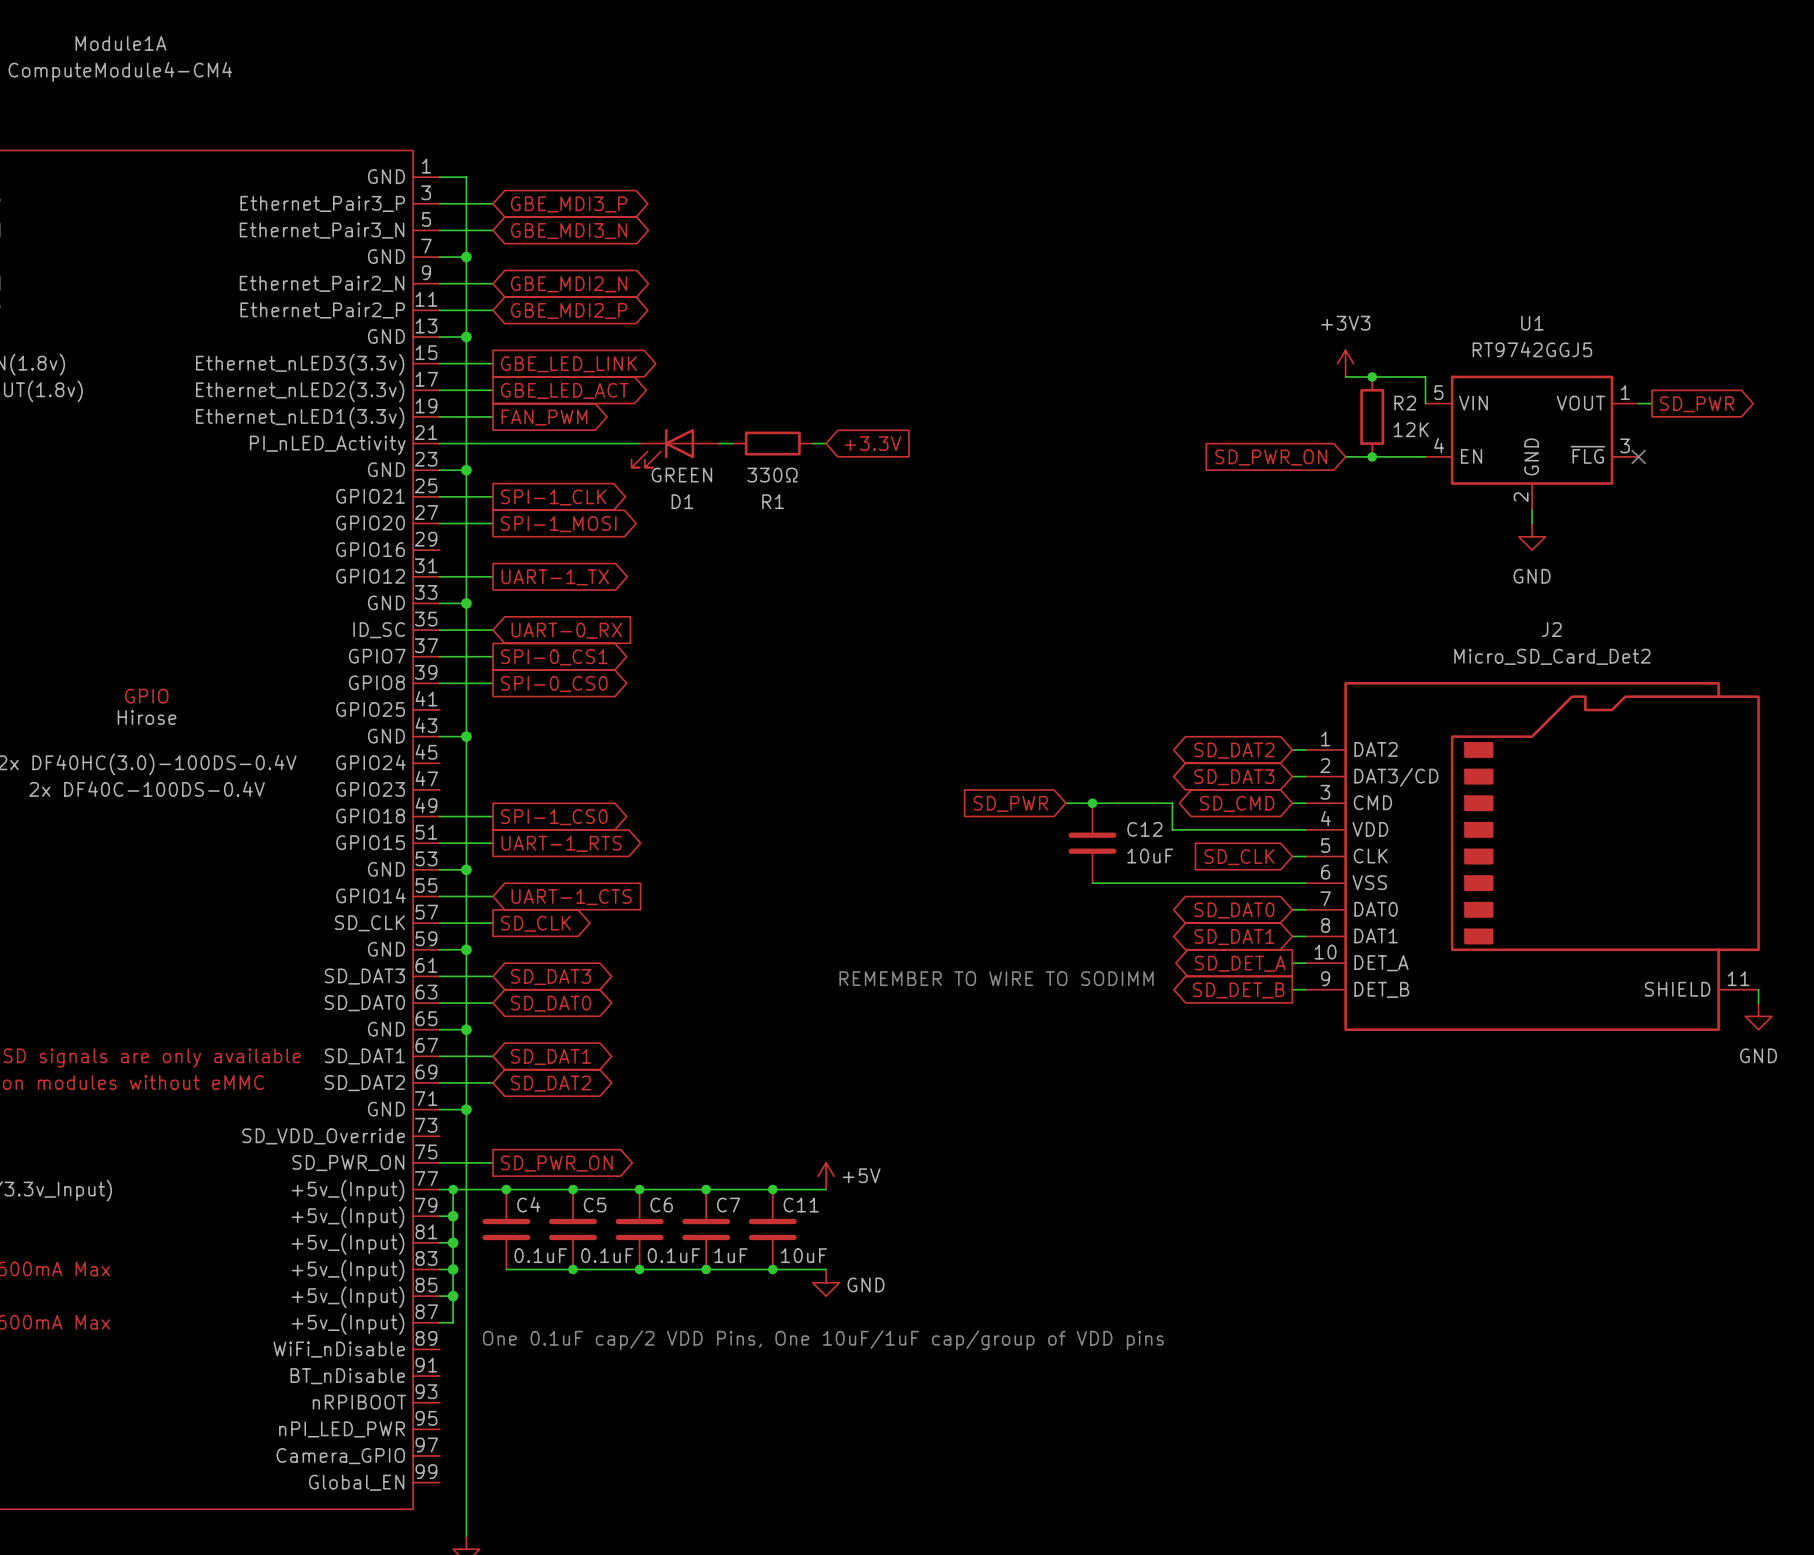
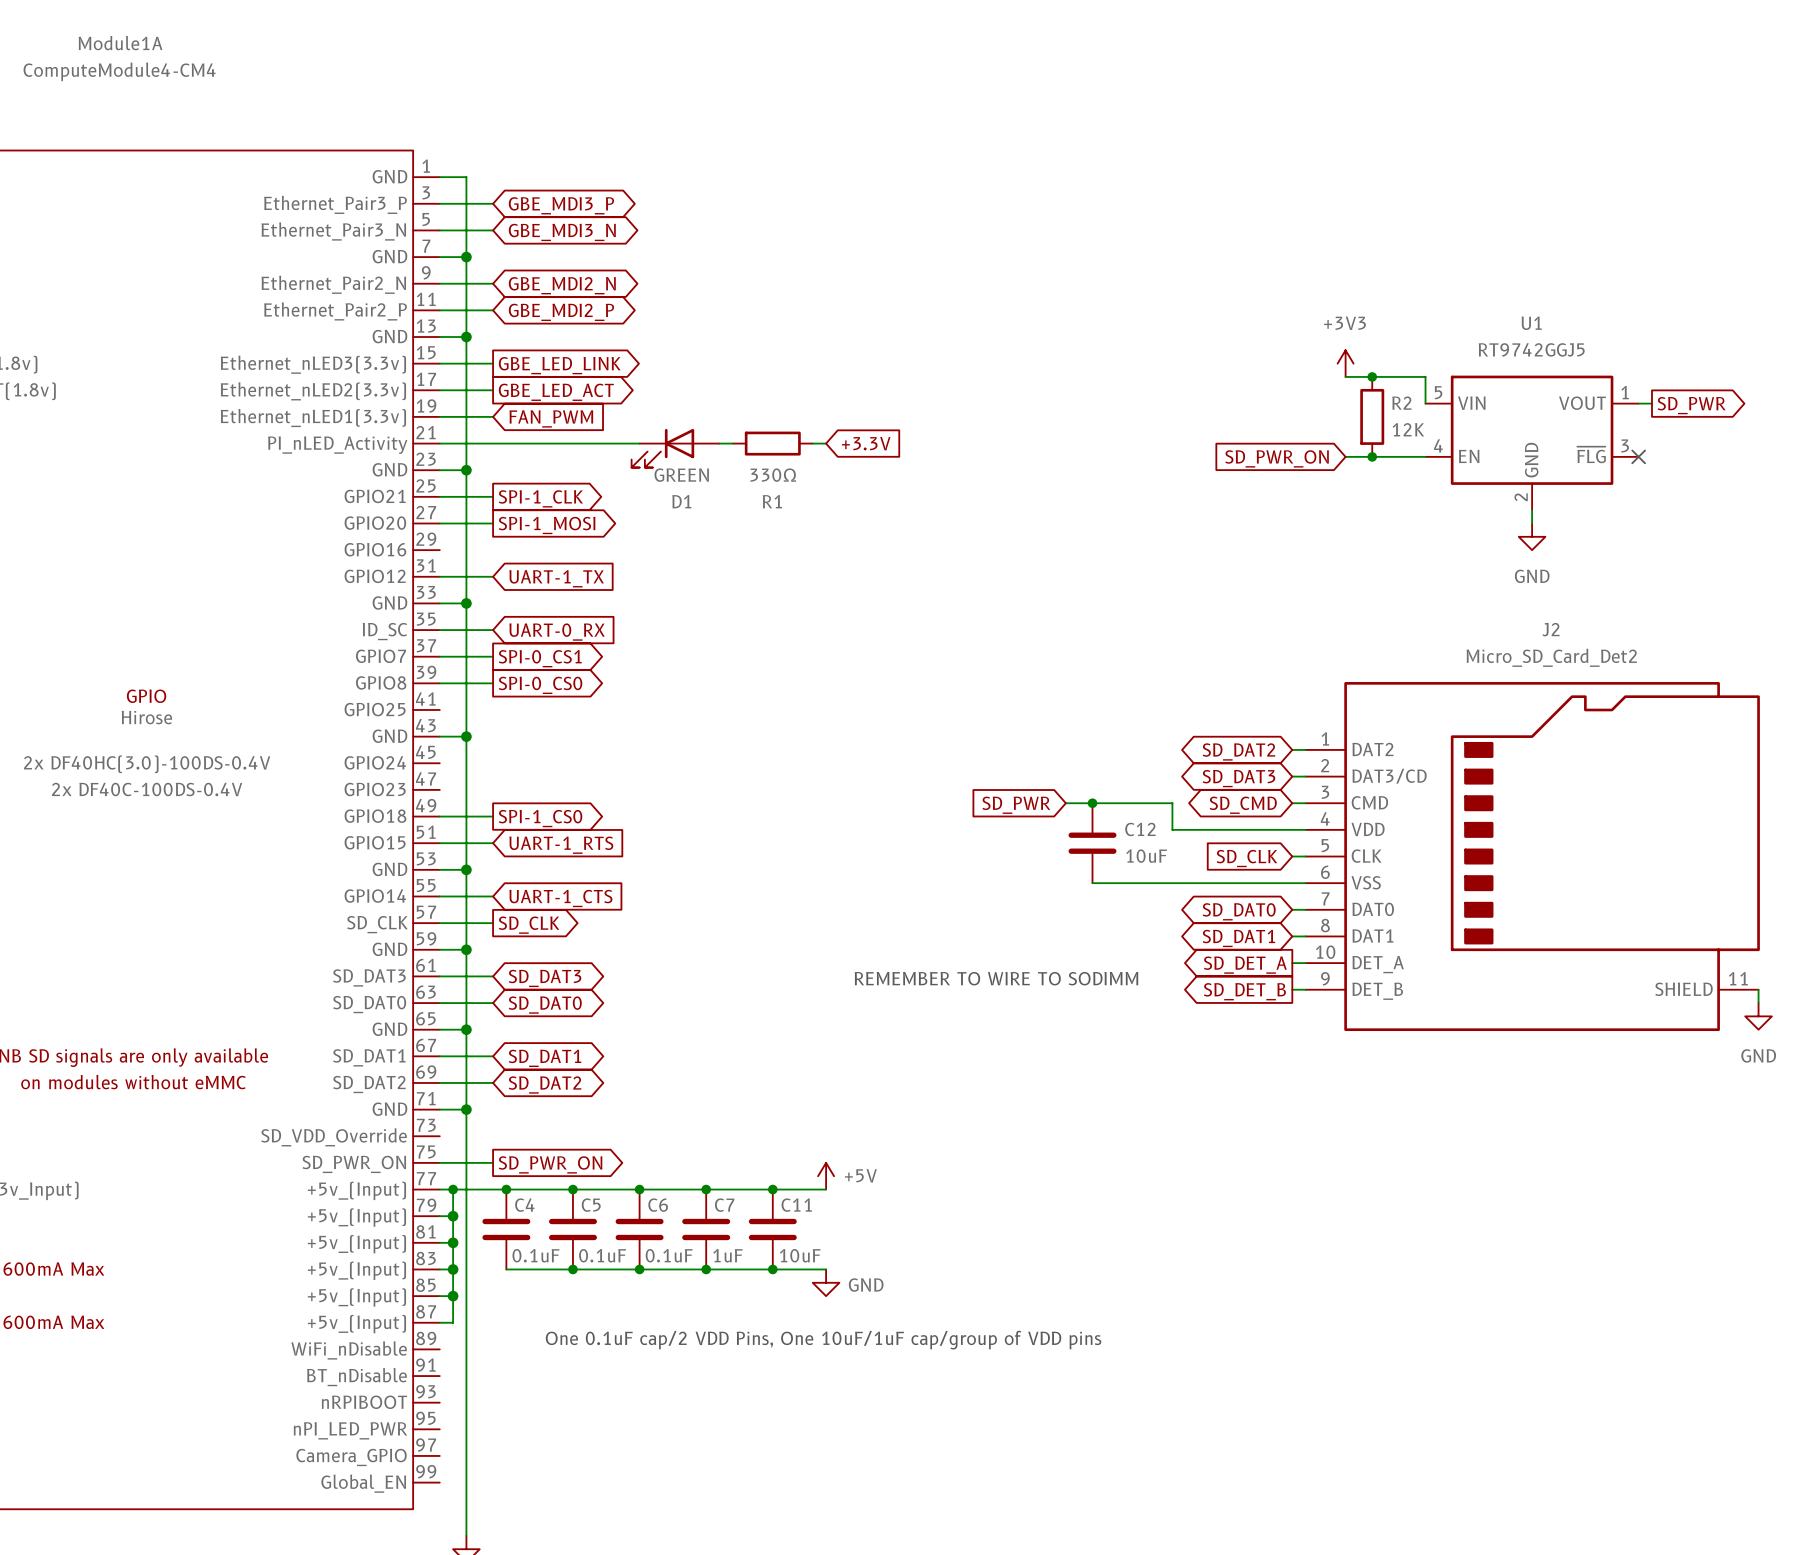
global label shape: output (544, 417) -> input (551, 418)
global label shape: output (555, 577) -> input (556, 578)
global label shape: output (561, 843) -> input (561, 845)

